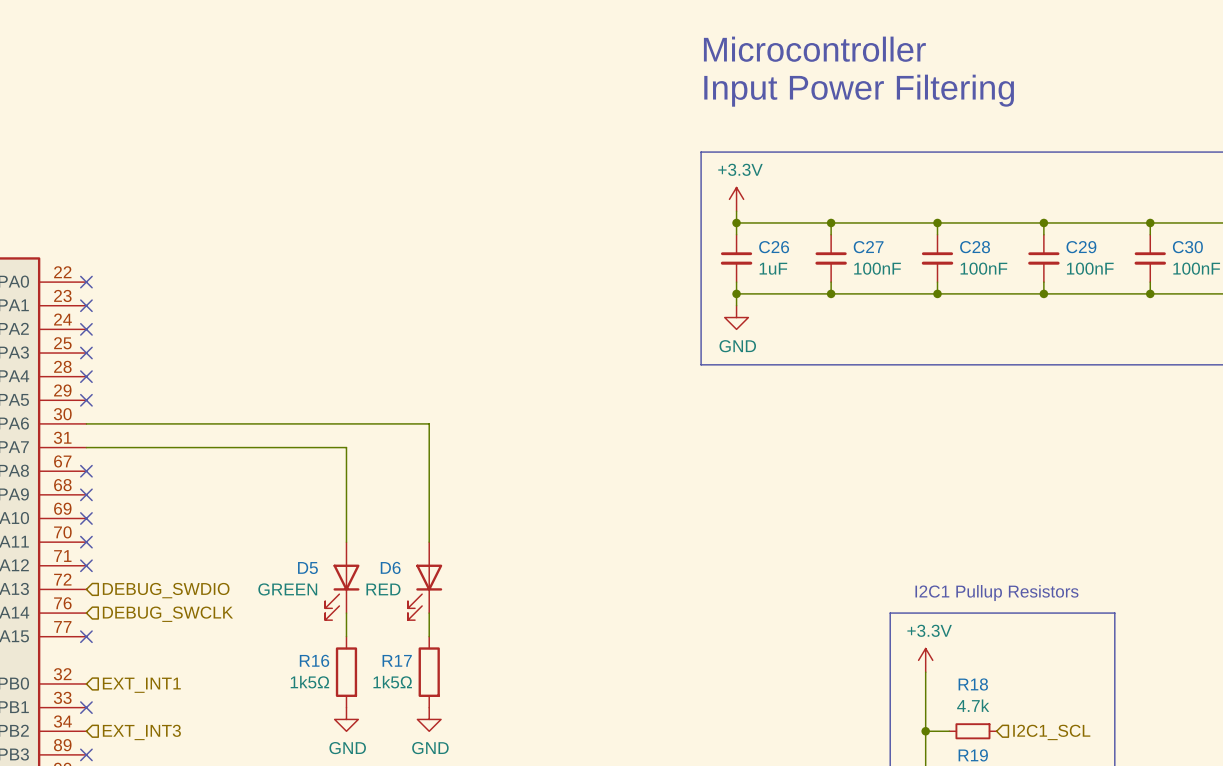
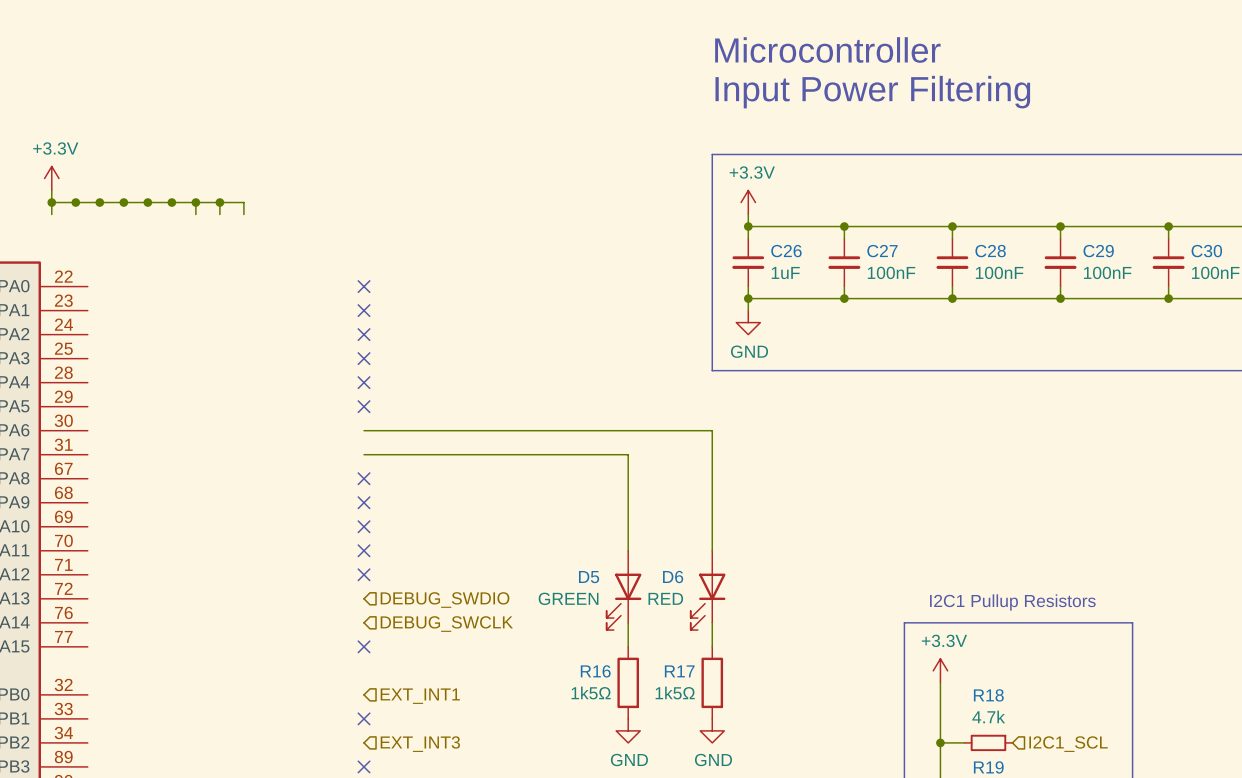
power symbol: none -> +3.3V (51, 178)
wire: none -> (51, 190) (51, 214)
wire: none -> (51, 202) (243, 202) (243, 214)
junction: none -> (51, 202)
junction: none -> (75, 202)
junction: none -> (99, 202)
junction: none -> (123, 202)
junction: none -> (147, 202)
junction: none -> (171, 202)
wire: none -> (195, 202) (195, 214)
junction: none -> (195, 202)
wire: none -> (219, 202) (219, 214)
junction: none -> (219, 202)
no-connect mark: (86, 282) -> none
no-connect mark: none -> (364, 286)
no-connect mark: (86, 305) -> none
no-connect mark: none -> (364, 310)
no-connect mark: (86, 329) -> none
no-connect mark: none -> (364, 334)
no-connect mark: (86, 353) -> none
no-connect mark: none -> (364, 358)
no-connect mark: (86, 376) -> none
no-connect mark: none -> (364, 382)
no-connect mark: (86, 400) -> none
no-connect mark: none -> (364, 406)
wire: (86, 423) (358, 423) -> none
wire: (429, 423) (429, 542) -> (436, 430) (712, 430) (712, 550)
wire: (86, 447) (346, 447) (346, 542) -> none
wire: none -> (364, 454) (628, 454) (628, 550)
no-connect mark: (86, 471) -> none
no-connect mark: none -> (364, 478)
no-connect mark: (86, 494) -> none
no-connect mark: none -> (364, 502)
no-connect mark: (86, 518) -> none
no-connect mark: none -> (364, 526)
no-connect mark: (86, 542) -> none
no-connect mark: none -> (364, 550)
no-connect mark: (86, 565) -> none
no-connect mark: none -> (364, 574)
D5 position: (342, 581) -> (624, 590)
D6 position: (425, 581) -> (708, 590)
hierarchical label: DEBUG_SWDIO (166, 590) -> none
hierarchical label: none -> DEBUG_SWDIO (445, 600)
wire: (346, 613) (346, 636) -> none
wire: (429, 613) (429, 636) -> (628, 622) (628, 646)
wire: none -> (712, 622) (712, 646)
hierarchical label: DEBUG_SWCLK (167, 614) -> none
hierarchical label: none -> DEBUG_SWCLK (446, 624)
no-connect mark: (86, 636) -> none
no-connect mark: none -> (364, 646)
R16 position: (346, 672) -> (628, 682)
R17 position: (429, 672) -> (712, 682)
hierarchical label: EXT_INT1 (141, 685) -> none
hierarchical label: none -> EXT_INT1 (420, 696)
no-connect mark: (86, 707) -> none
no-connect mark: none -> (364, 718)
power symbol: GND (346, 719) -> none
power symbol: GND (429, 719) -> none
power symbol: none -> GND (628, 730)
power symbol: none -> GND (712, 730)
hierarchical label: EXT_INT3 (141, 732) -> none
hierarchical label: none -> EXT_INT3 (420, 744)
no-connect mark: (86, 754) -> none
no-connect mark: none -> (364, 766)

